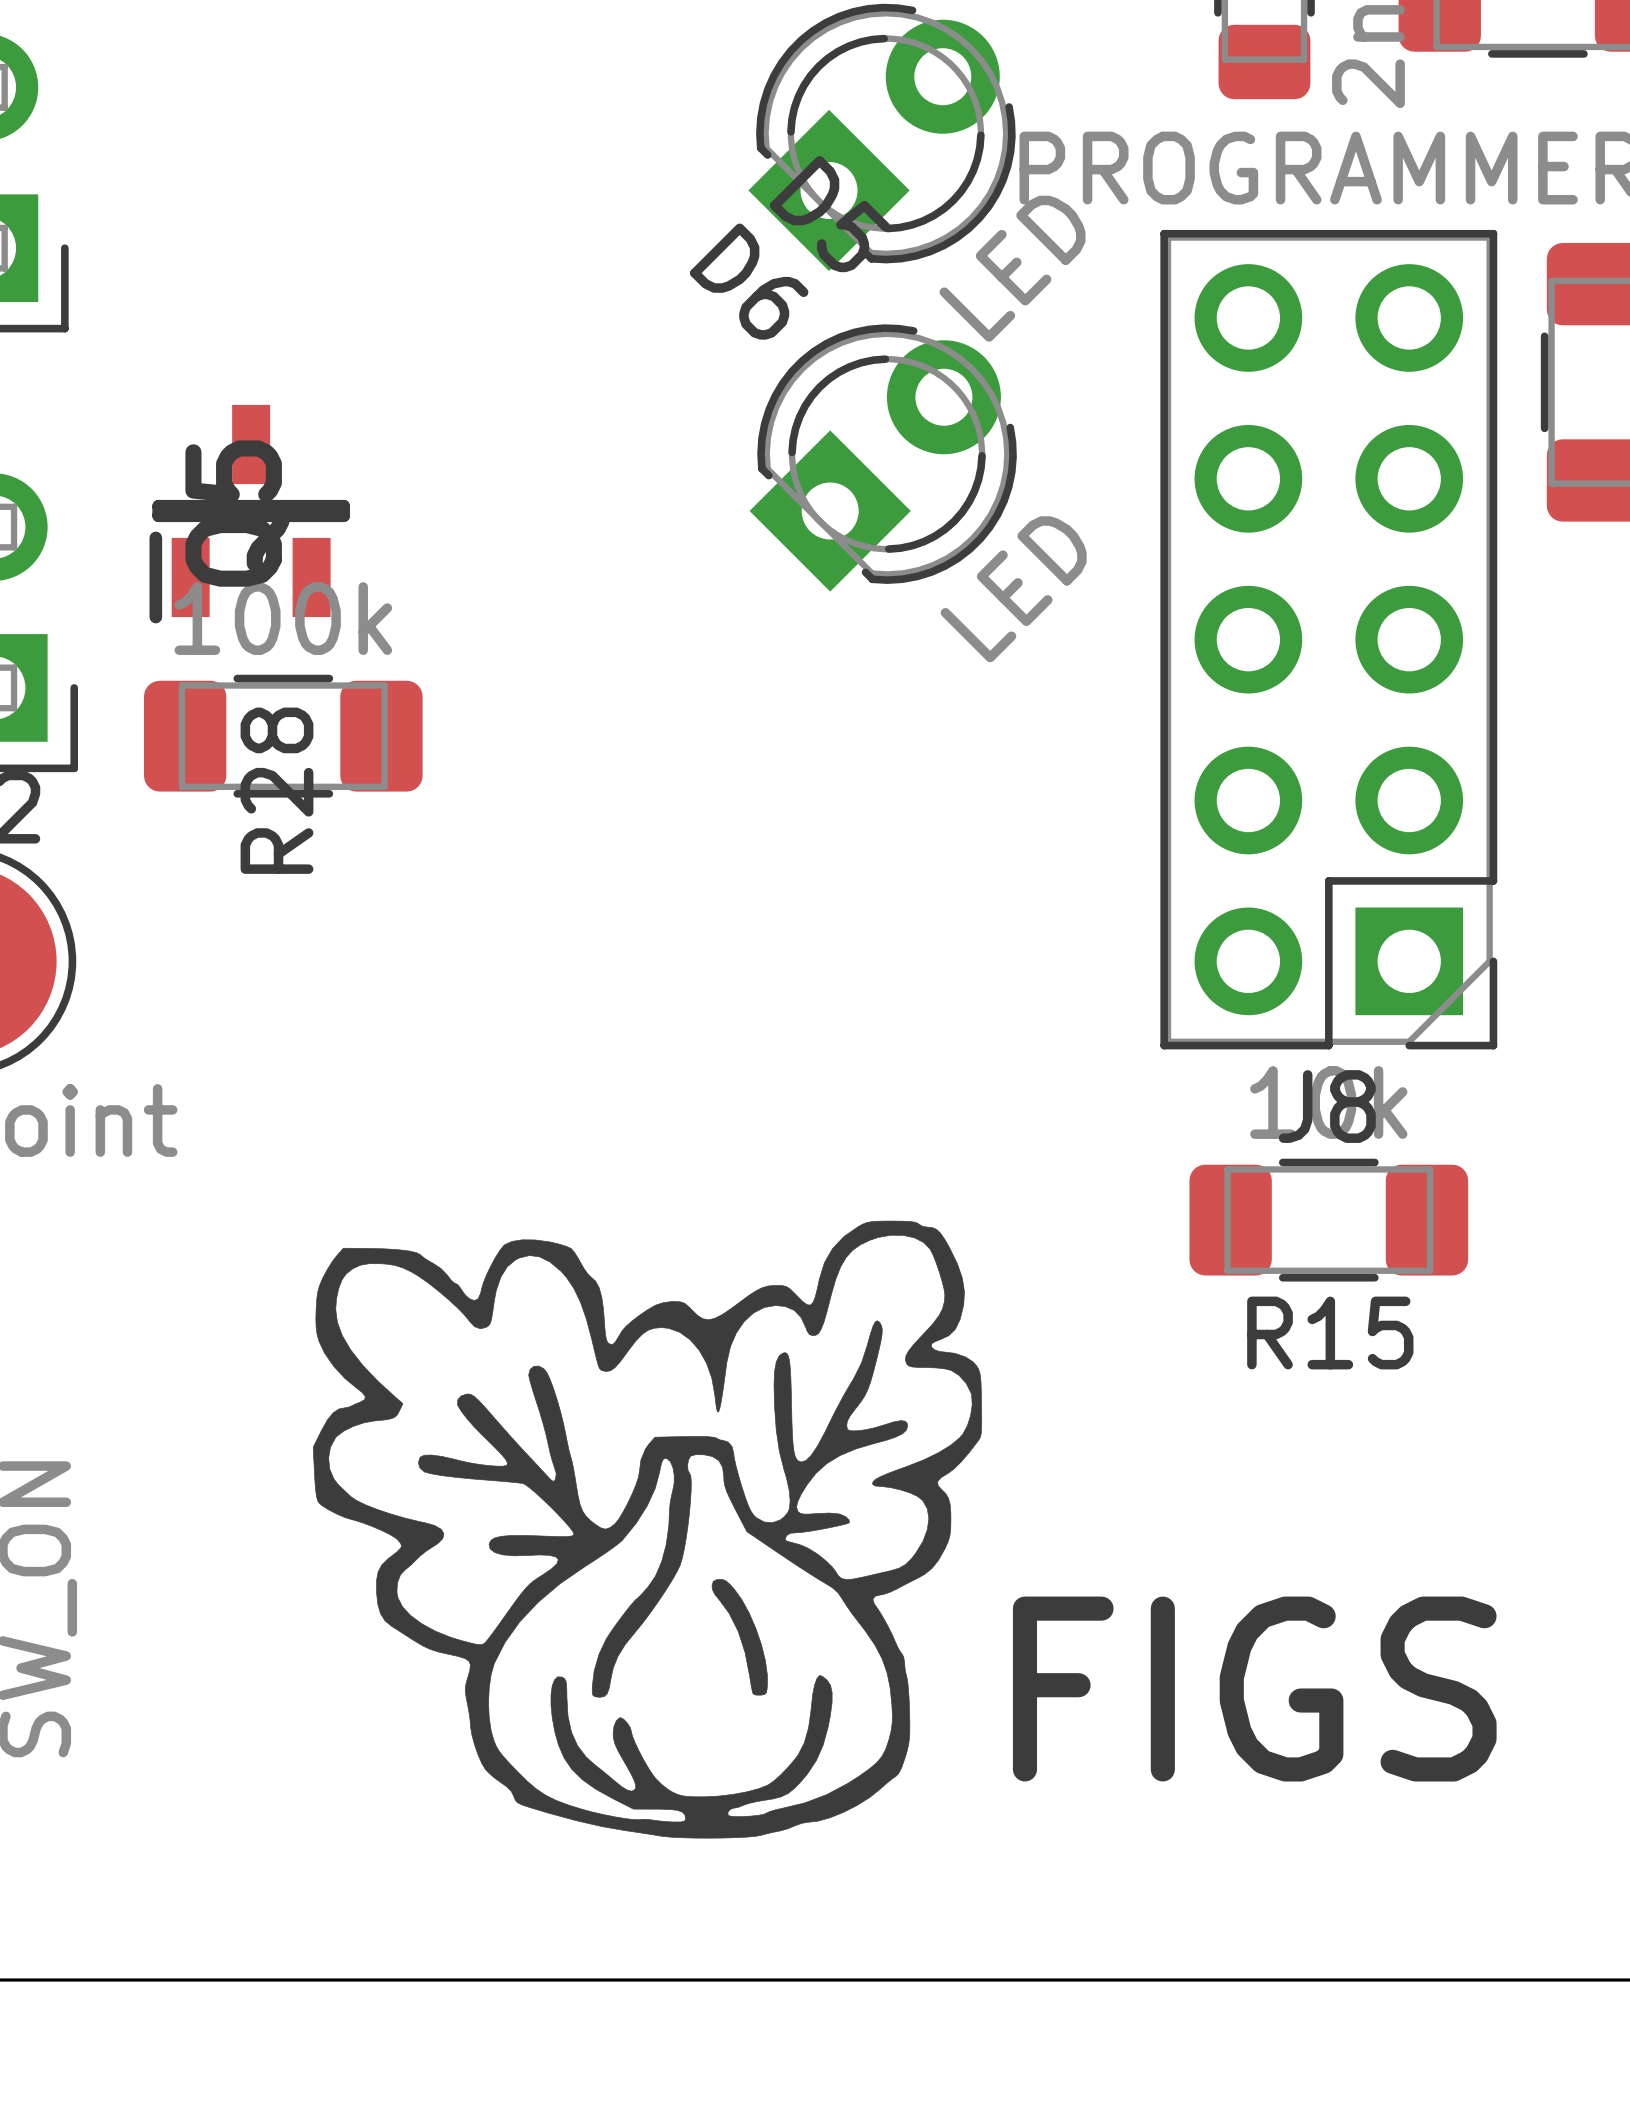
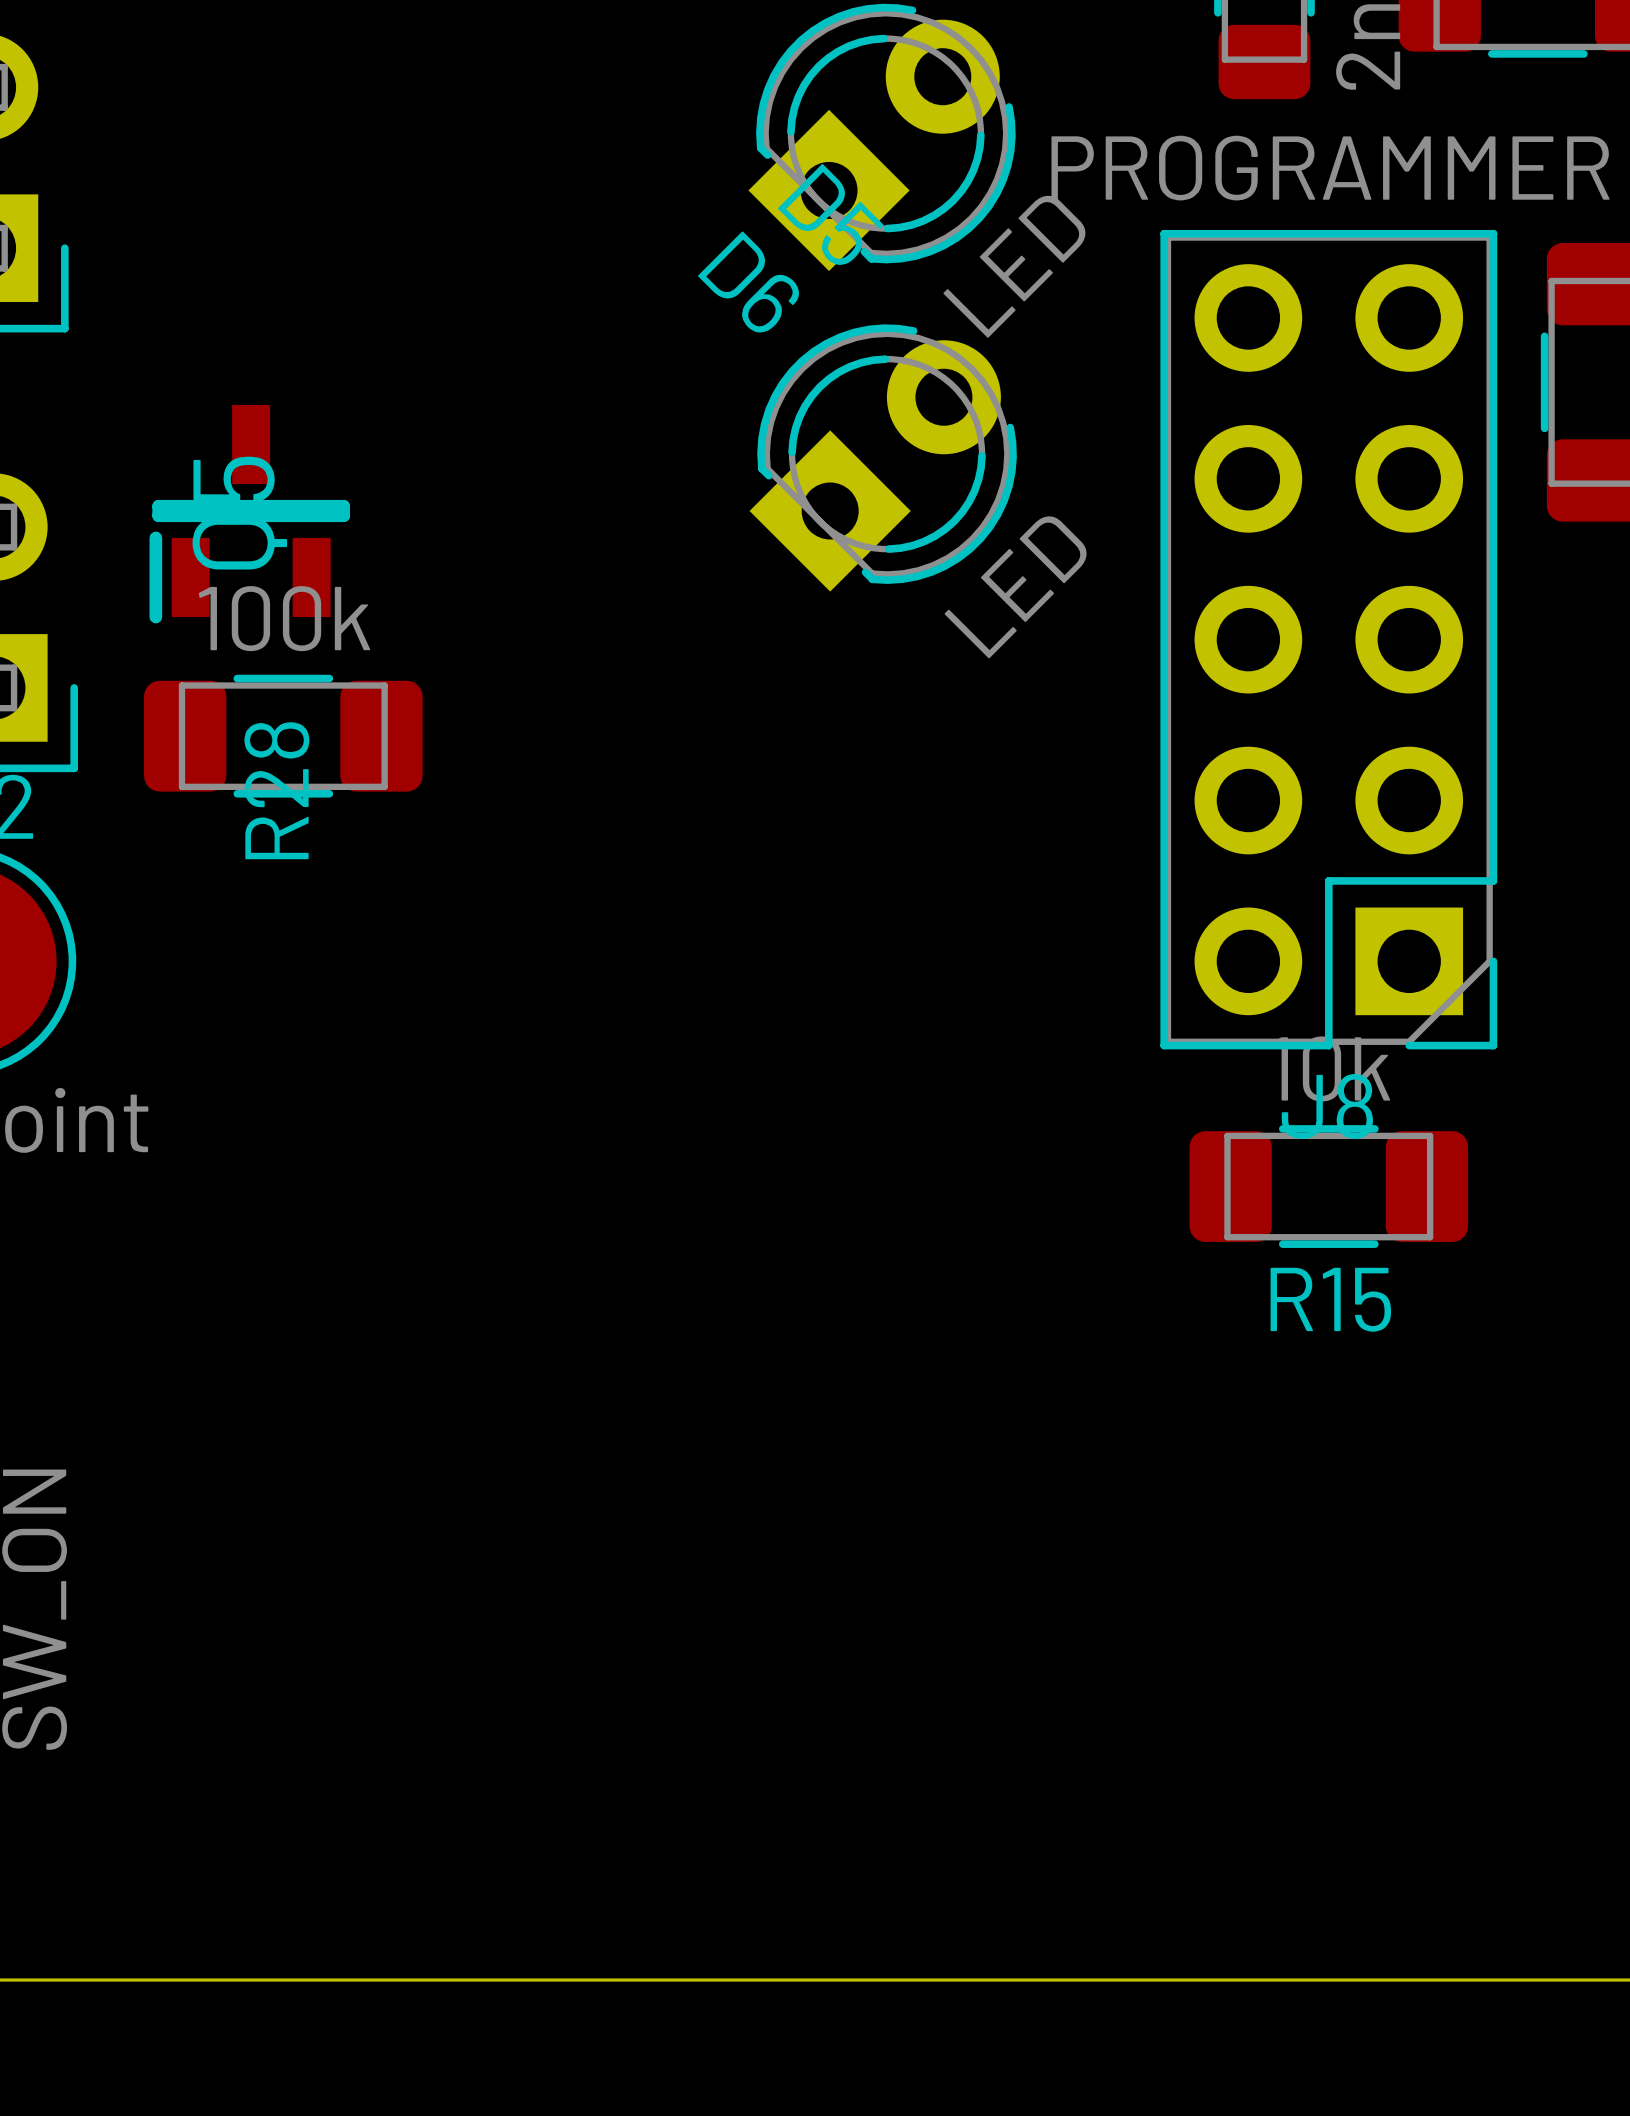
drawing: [312, 1220, 983, 1839] -> none
R15 position: (1328, 1220) -> (1328, 1186)
text: FIGS (1254, 1689) -> none

